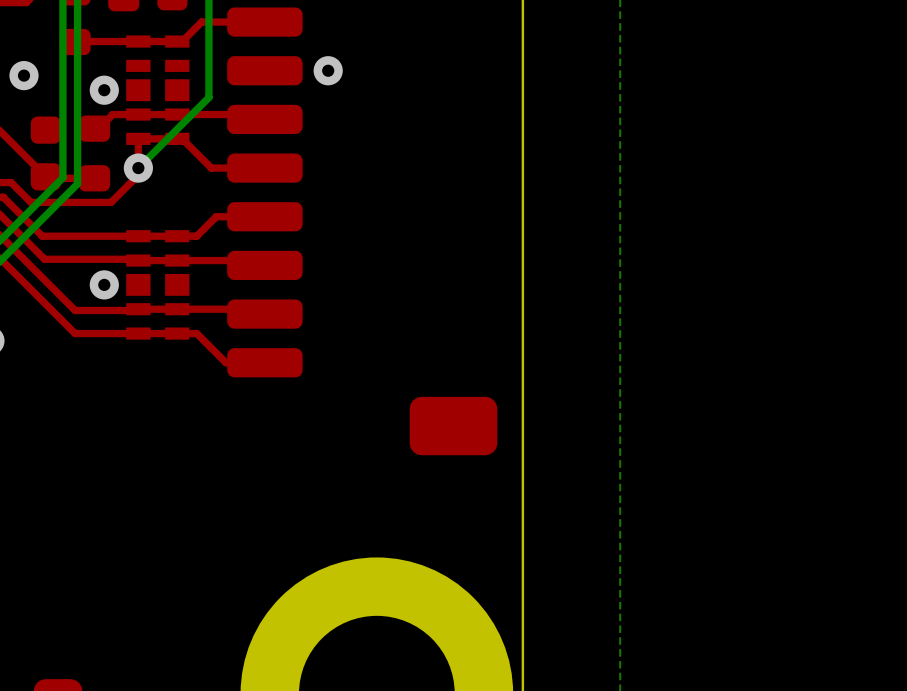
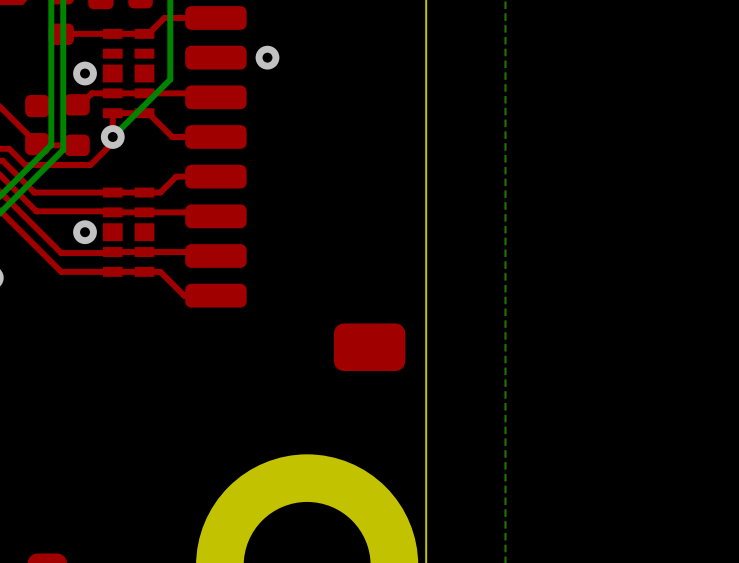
via: (24, 75) -> none

